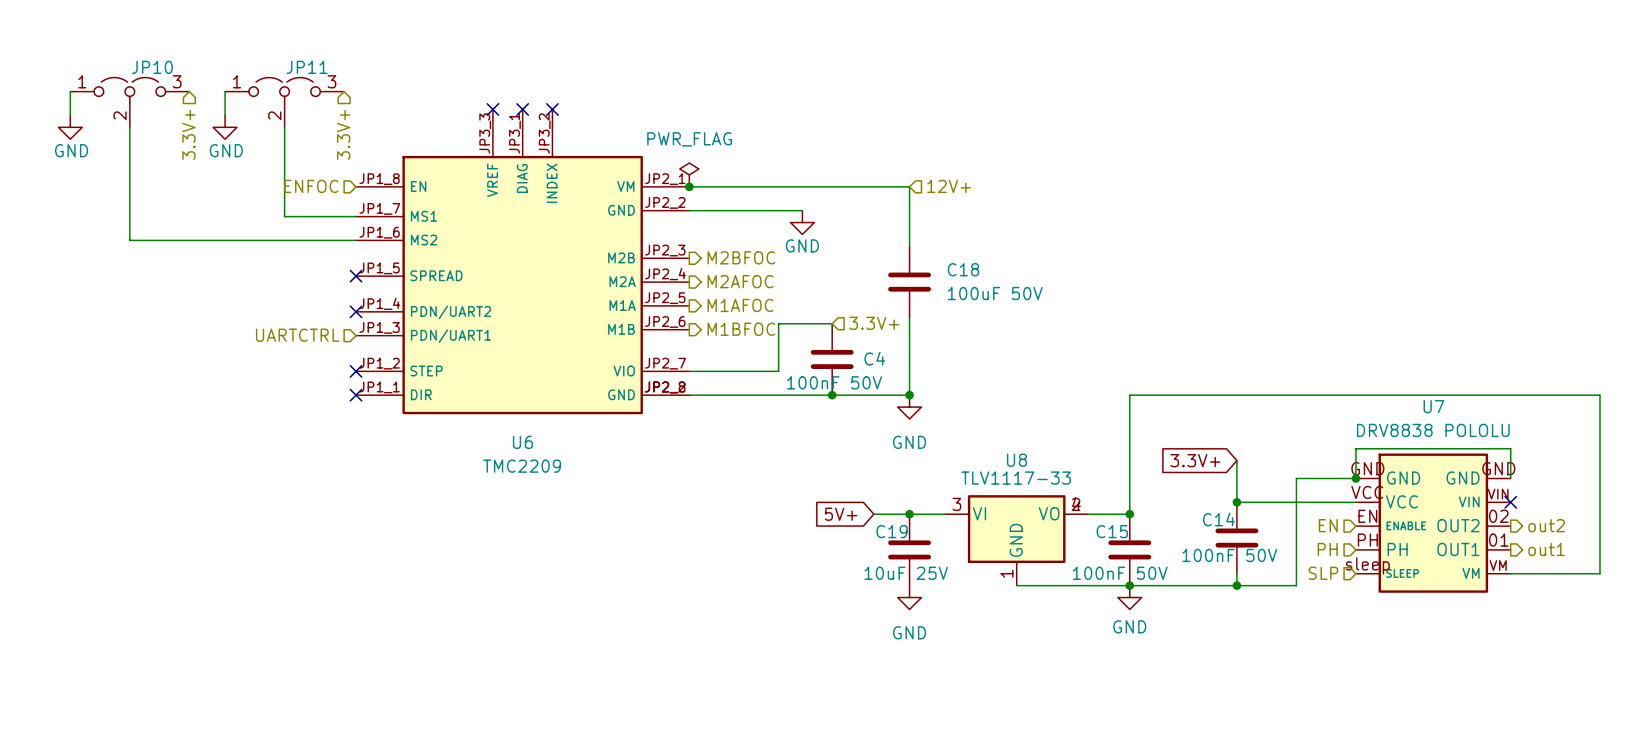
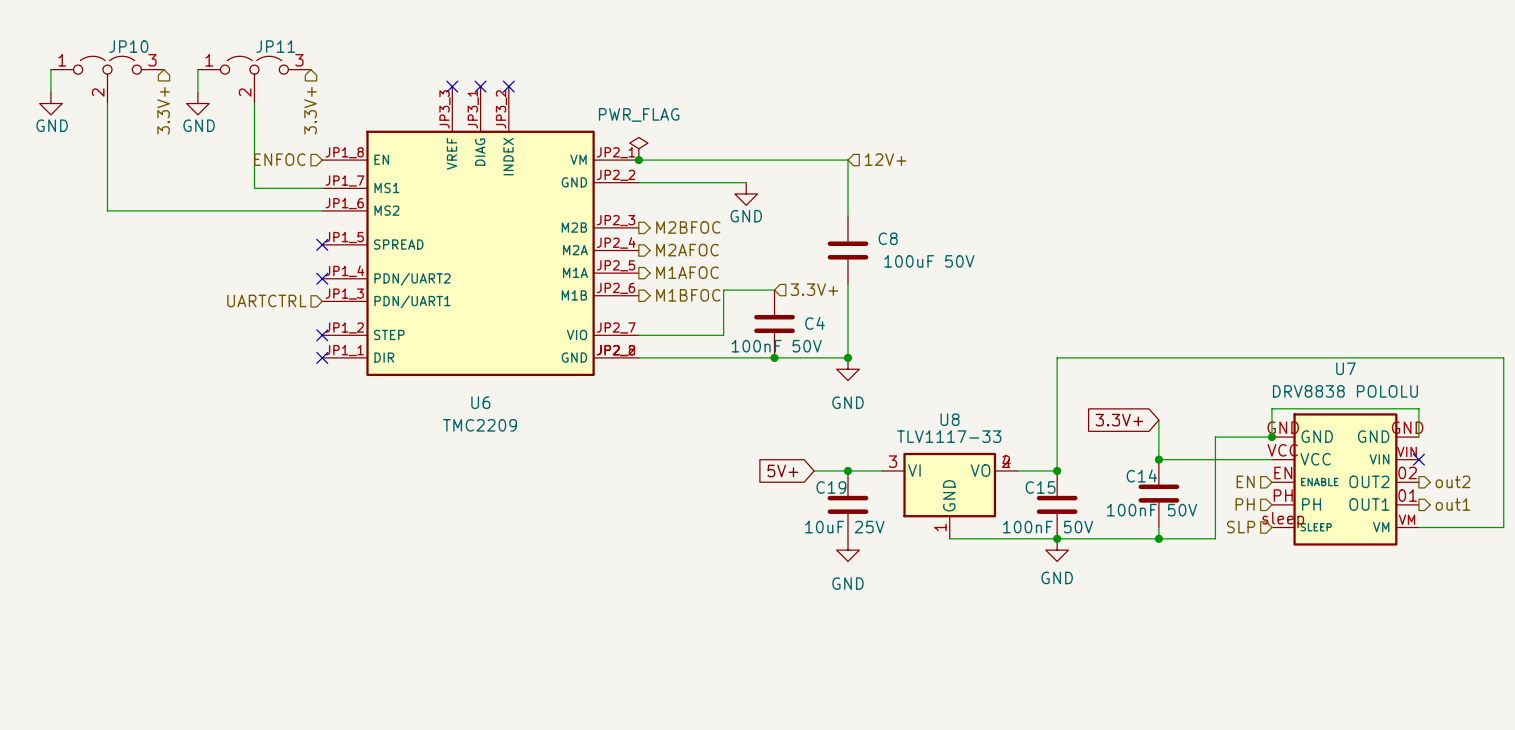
C18 name: C18 (963, 269) -> C8 (888, 238)

